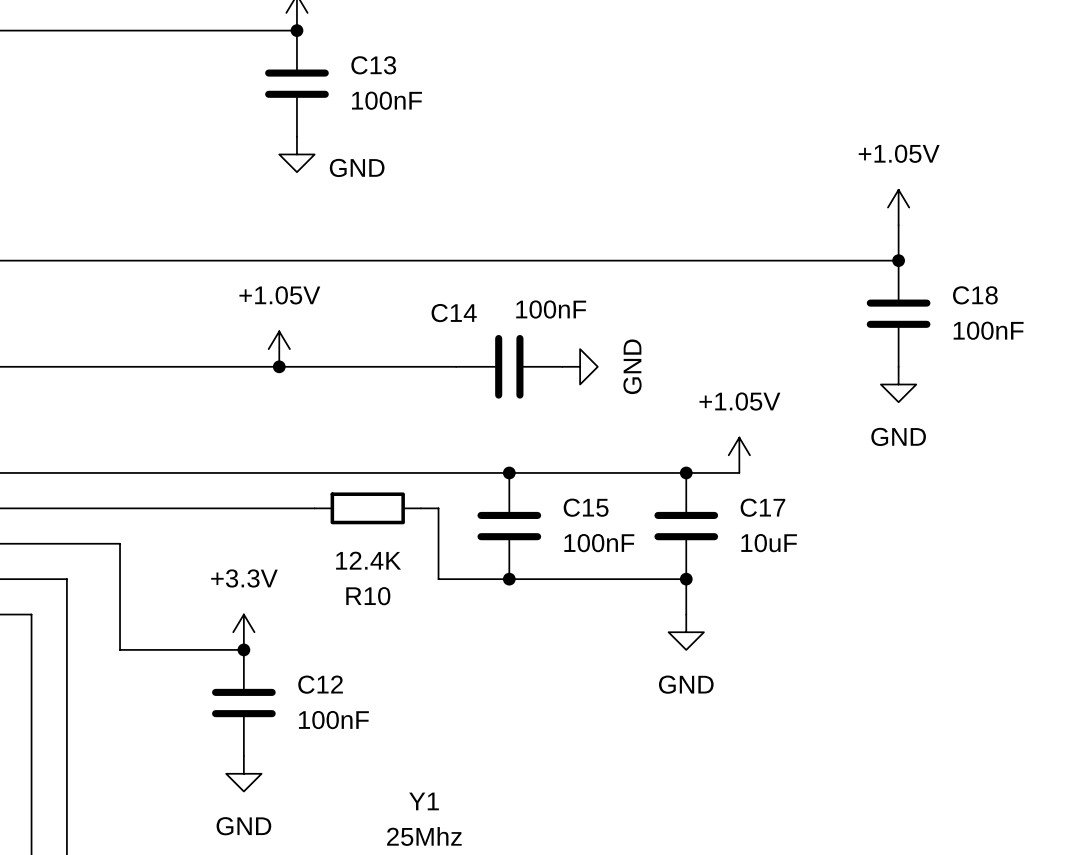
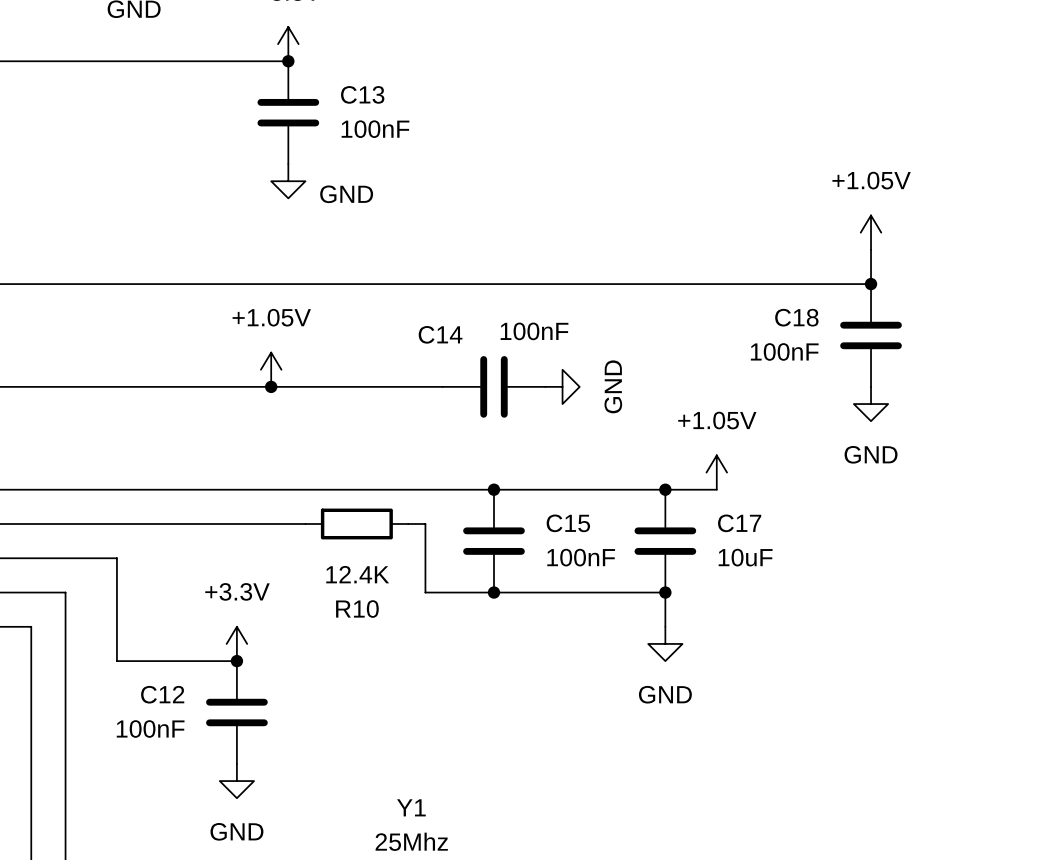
C18 name position: C18 (975, 295) -> C18 (796, 317)
C18 value position: 100nF (988, 330) -> 100nF (784, 351)
C12 name position: C12 (320, 684) -> C12 (162, 694)
C12 value position: 100nF (333, 720) -> 100nF (150, 729)

